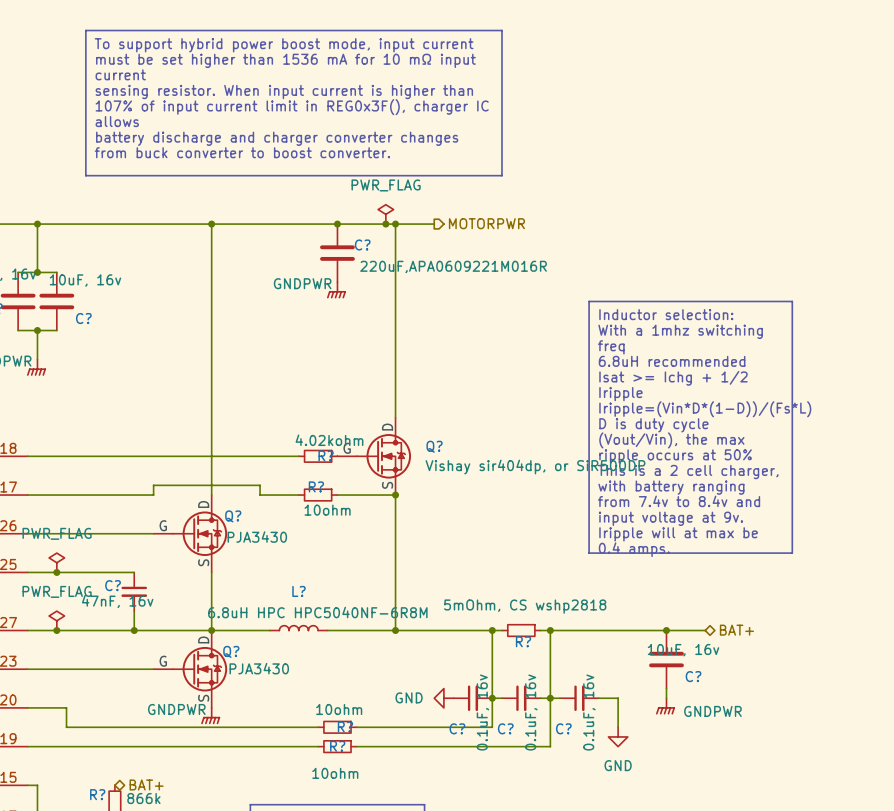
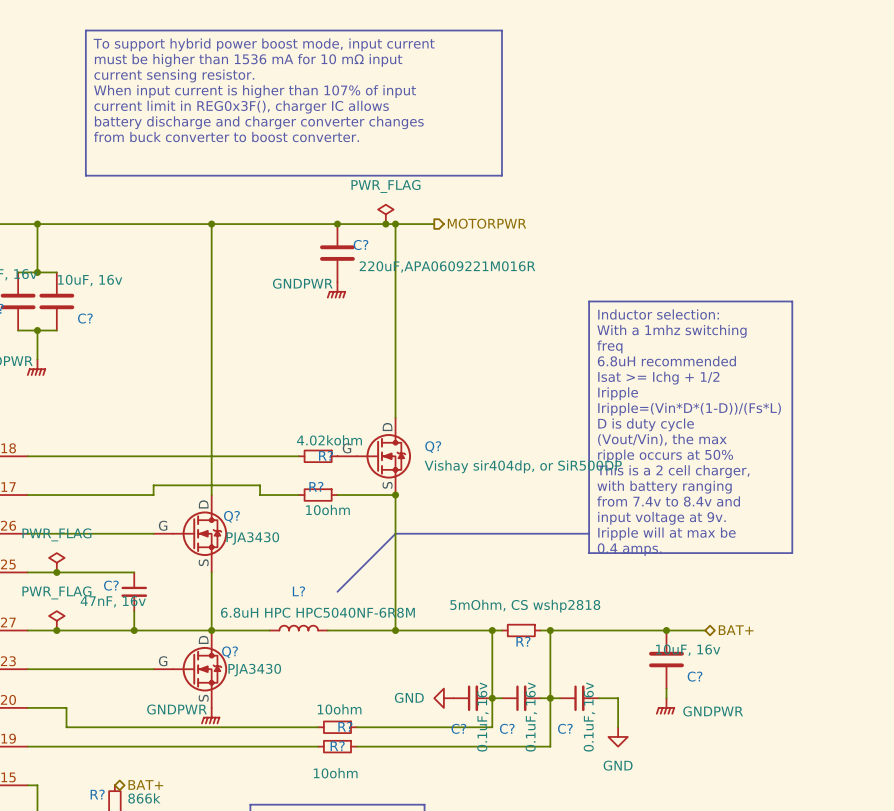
text: must be set higher than 1536 mA for 10 mΩ input (285, 60) -> must be higher than 1536 mA for 10 mΩ input (248, 60)
text: current (120, 74) -> current sensing resistor. (174, 75)
text: sensing resistor. When input current is higher than (284, 92) -> When input current is higher than 107% of input (255, 91)
text: 107% of input current limit in REG0x3F(), charger IC (292, 107) -> current limit in REG0x3F(), charger IC allows (241, 107)
text: allows (117, 121) -> battery discharge and charger converter changes (259, 122)
text: battery discharge and charger converter changes (277, 138) -> from buck converter to boost converter. (226, 137)
text: from buck converter to boost converter. (242, 152) -> none
line: none -> (589, 533) (395, 533) (337, 591)

